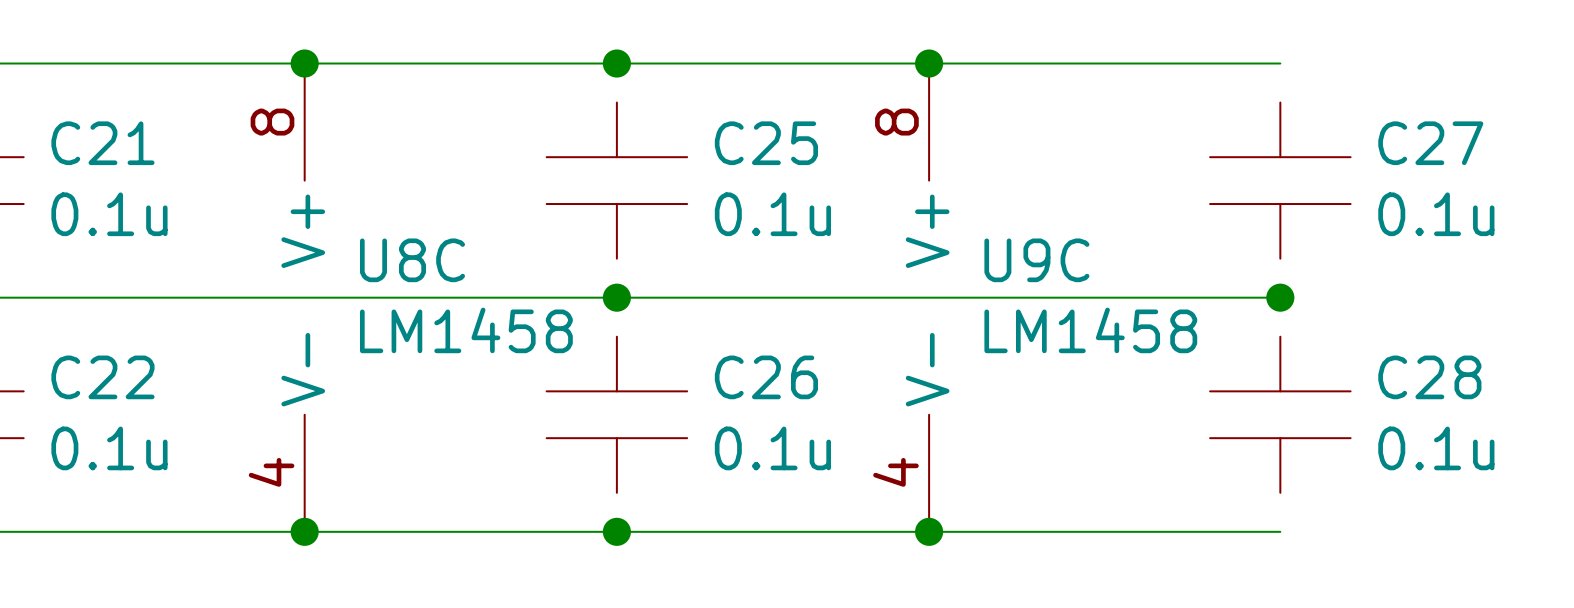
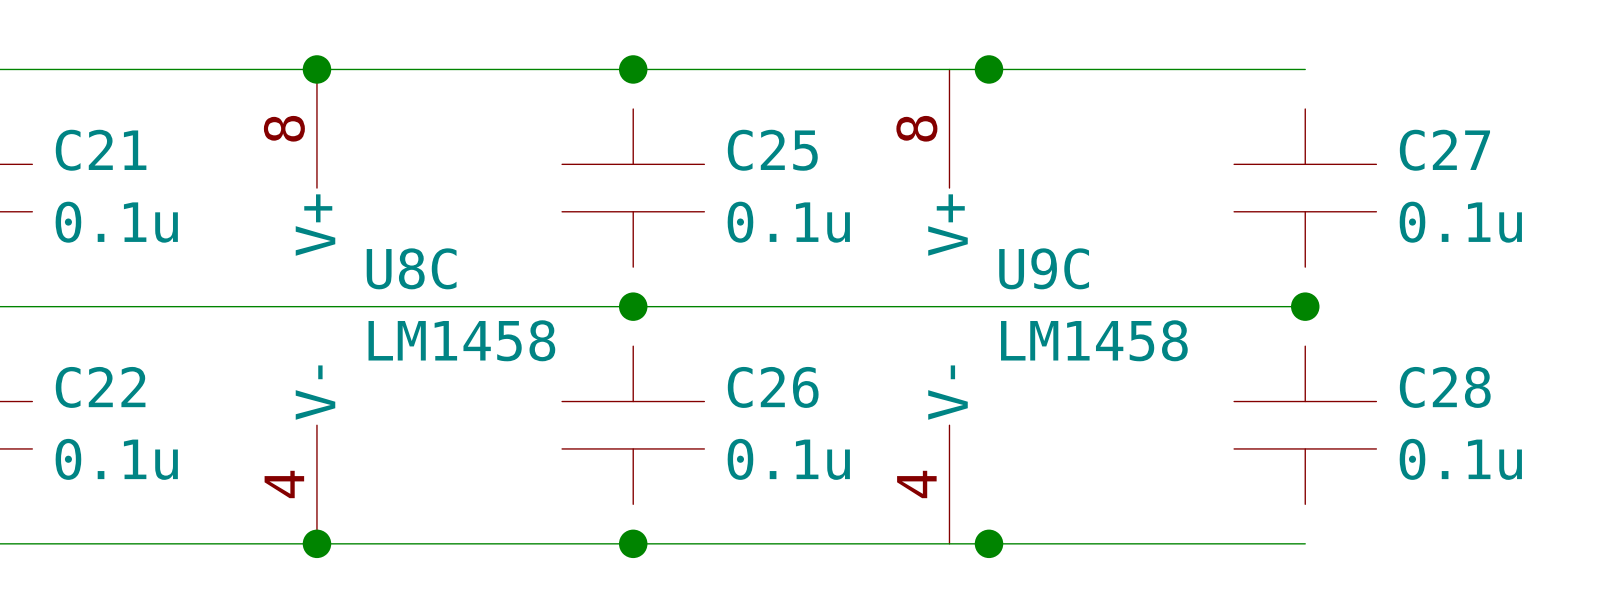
junction position: (929, 63) -> (989, 69)
junction position: (929, 531) -> (989, 543)

